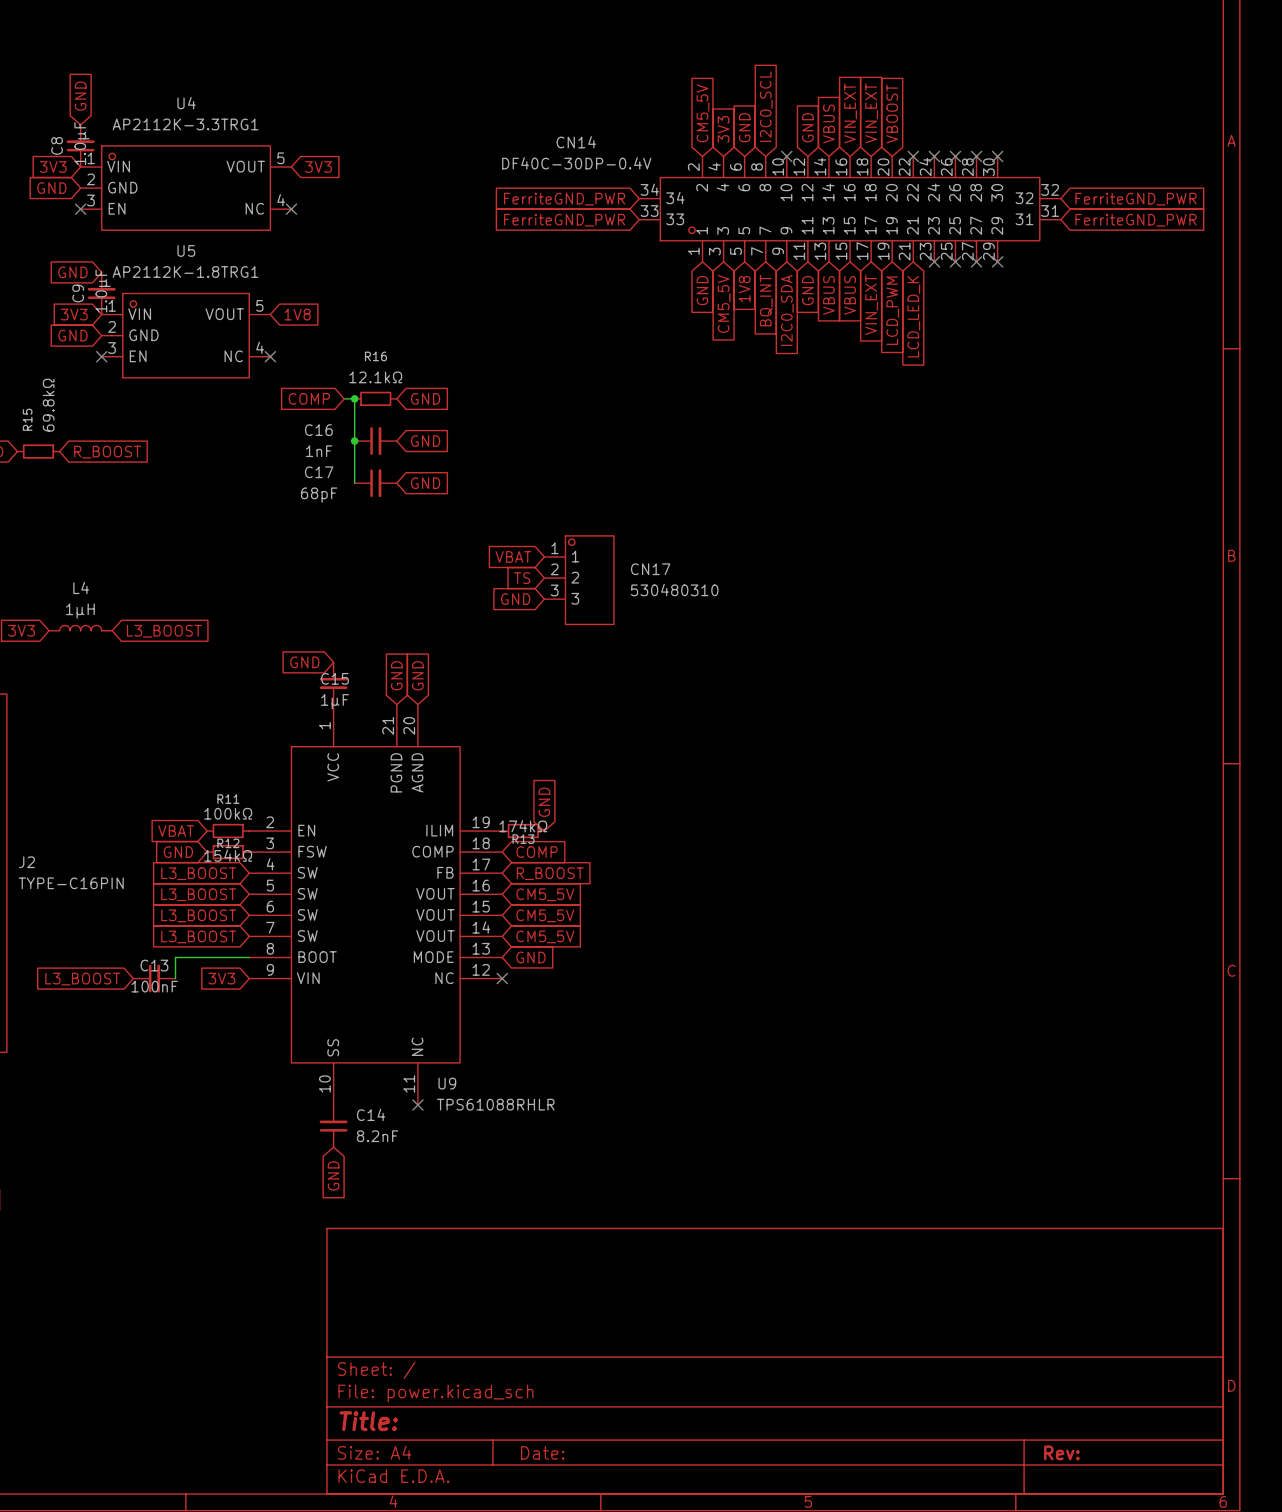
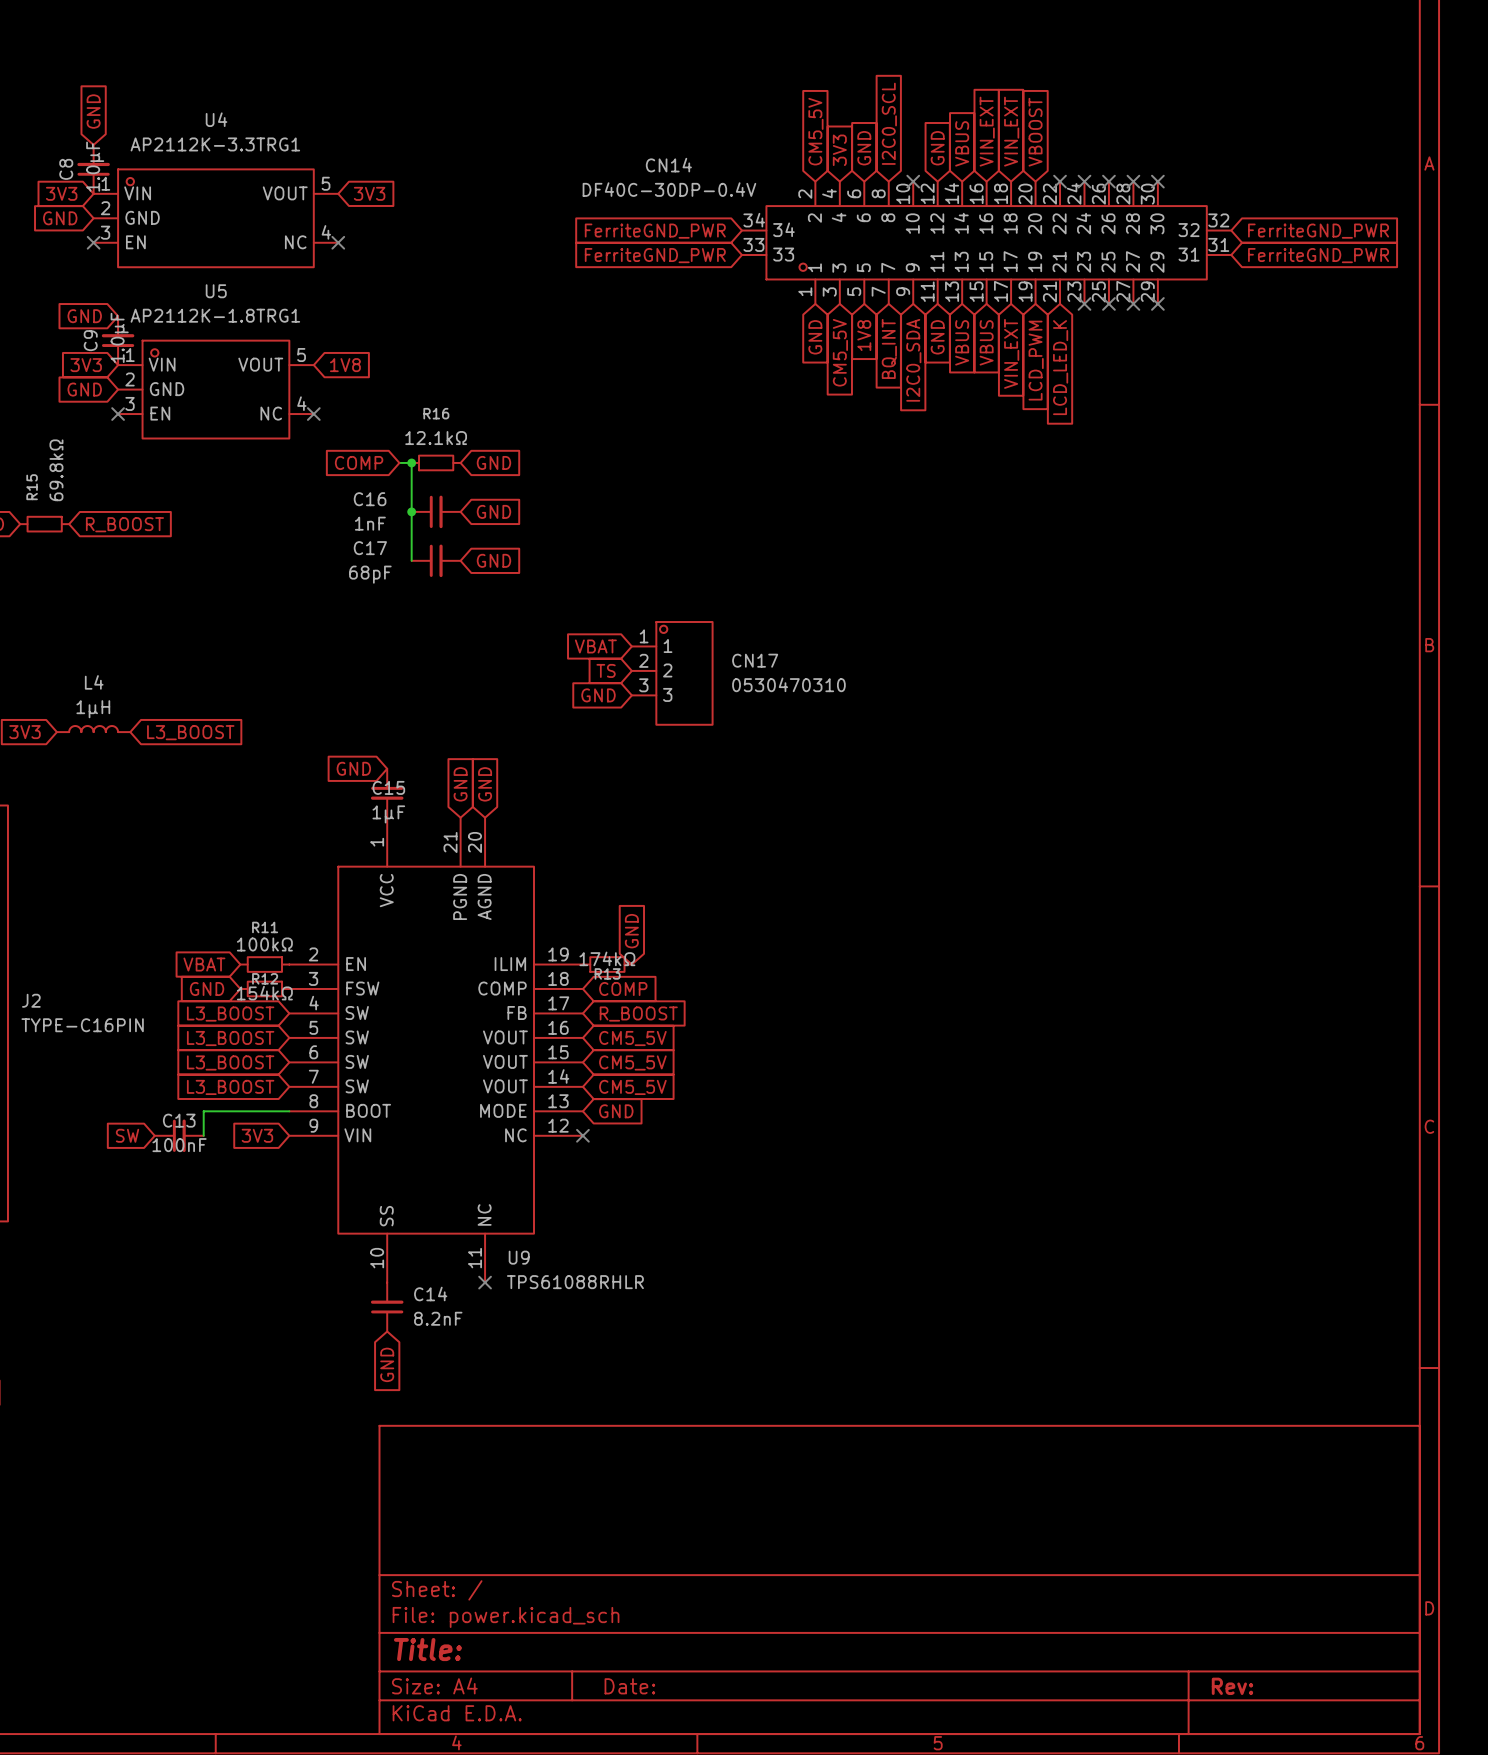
CN17 value: 530480310 (674, 590) -> 0530470310 (788, 684)
global label: L3_BOOST (82, 979) -> SW (127, 1135)

